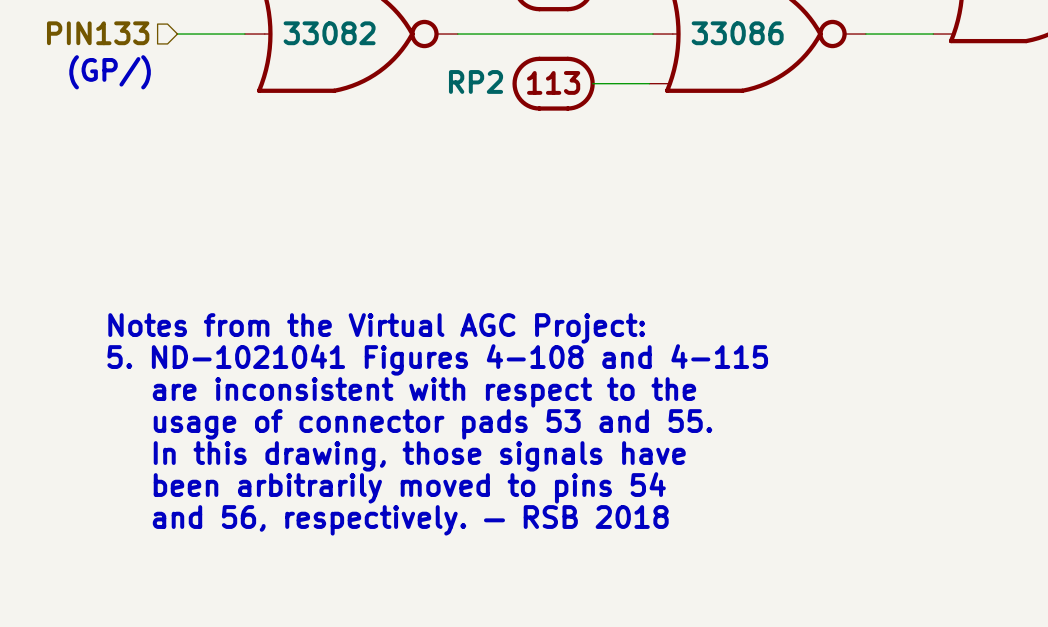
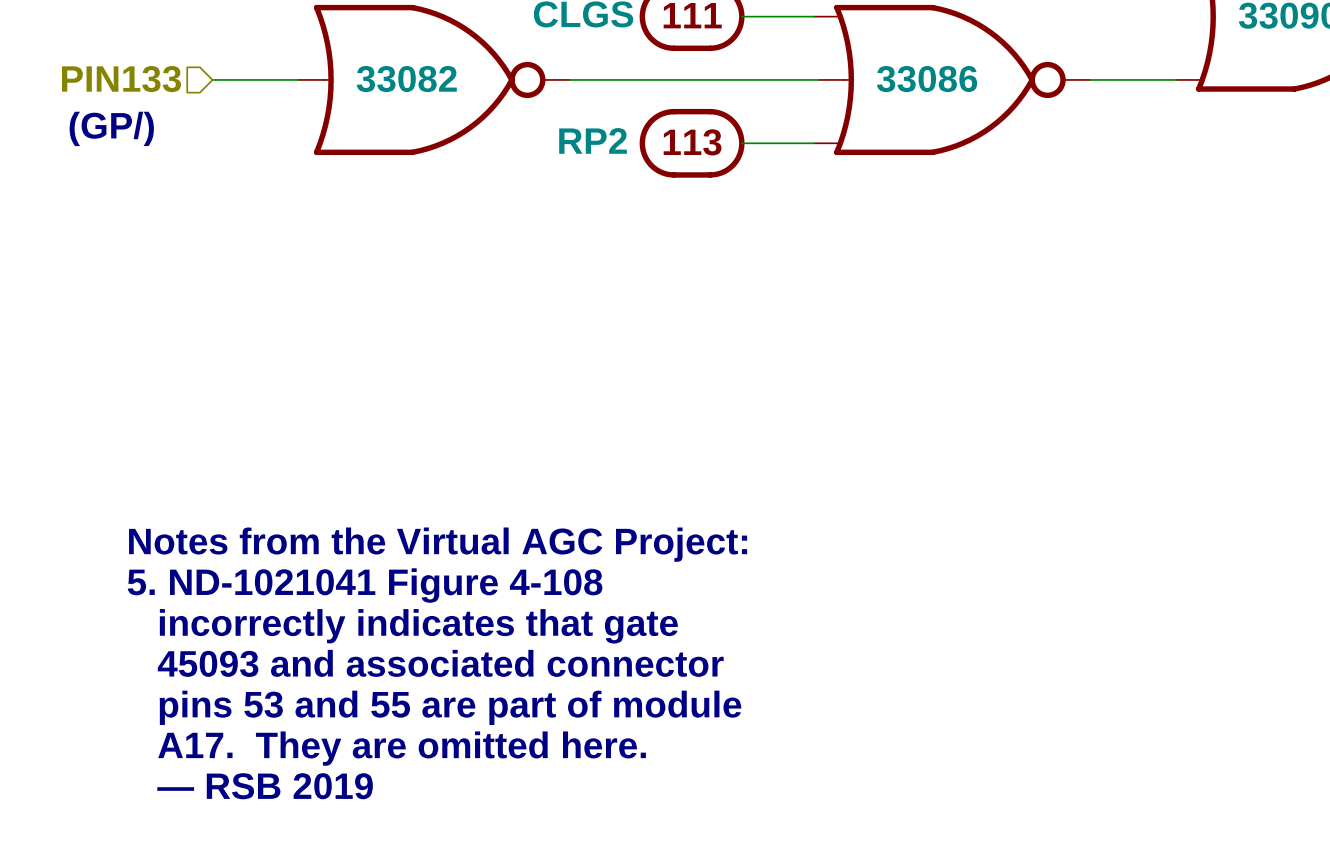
text position: Notes from the Virtual AGC Project: (376, 328) -> Notes from the Virtual AGC Project: (438, 544)
text: 5. ND-1021041 Figures 4-108 and 4-115 (437, 359) -> none
text: are inconsistent with respect to the (424, 392) -> none
text: usage of connector pads 53 and 55. (432, 424) -> none
text: none -> 5. ND-1021041 Figure 4-108 (365, 585)
text: In this drawing, those signals have (419, 456) -> none
text: none -> incorrectly indicates that gate (418, 626)
text: been arbitrarily moved to pins 54 (409, 487) -> none
text: none -> 45093 and associated connector (440, 663)
text: and 56, respectively. — RSB 2018 (410, 520) -> none
text: none -> pins 53 and 55 are part of module (450, 707)
text: none -> A17. They are omitted here. (402, 748)
text: none -> — RSB 2019 (265, 786)

